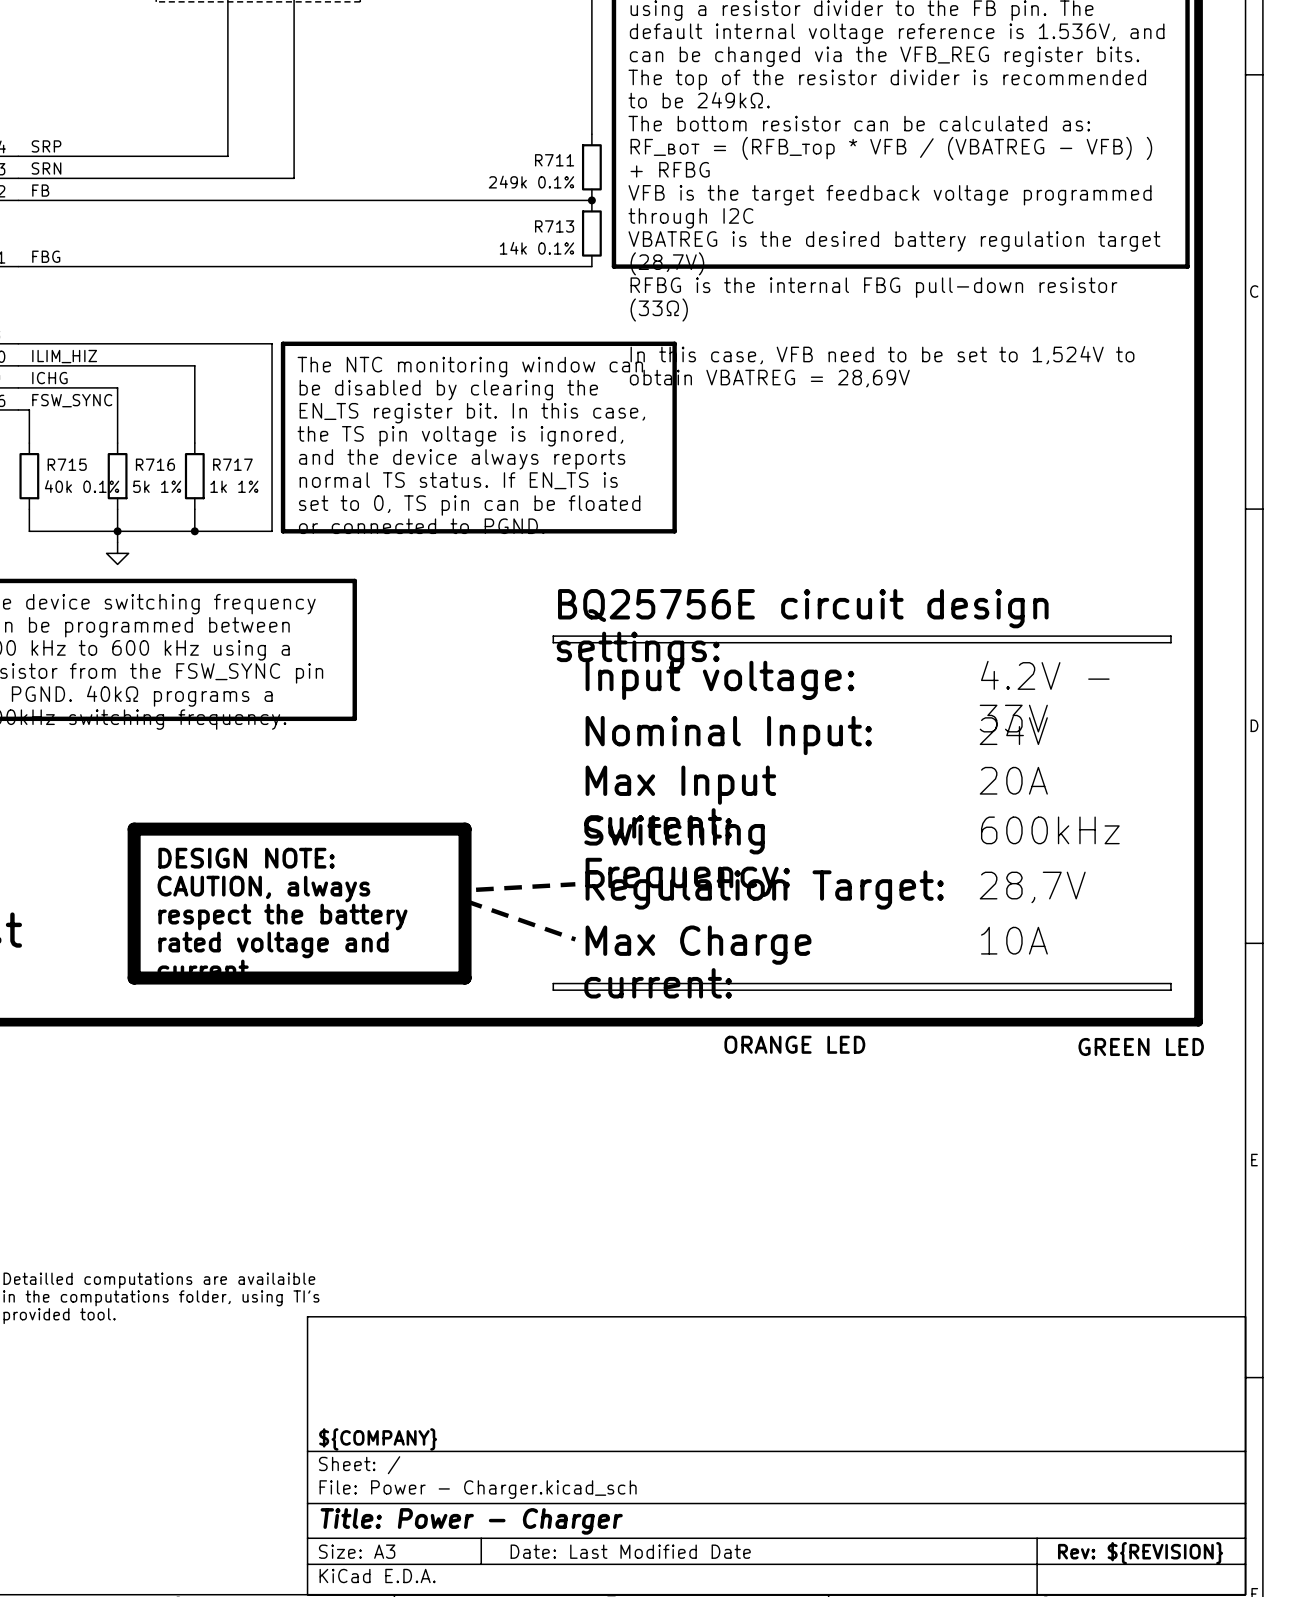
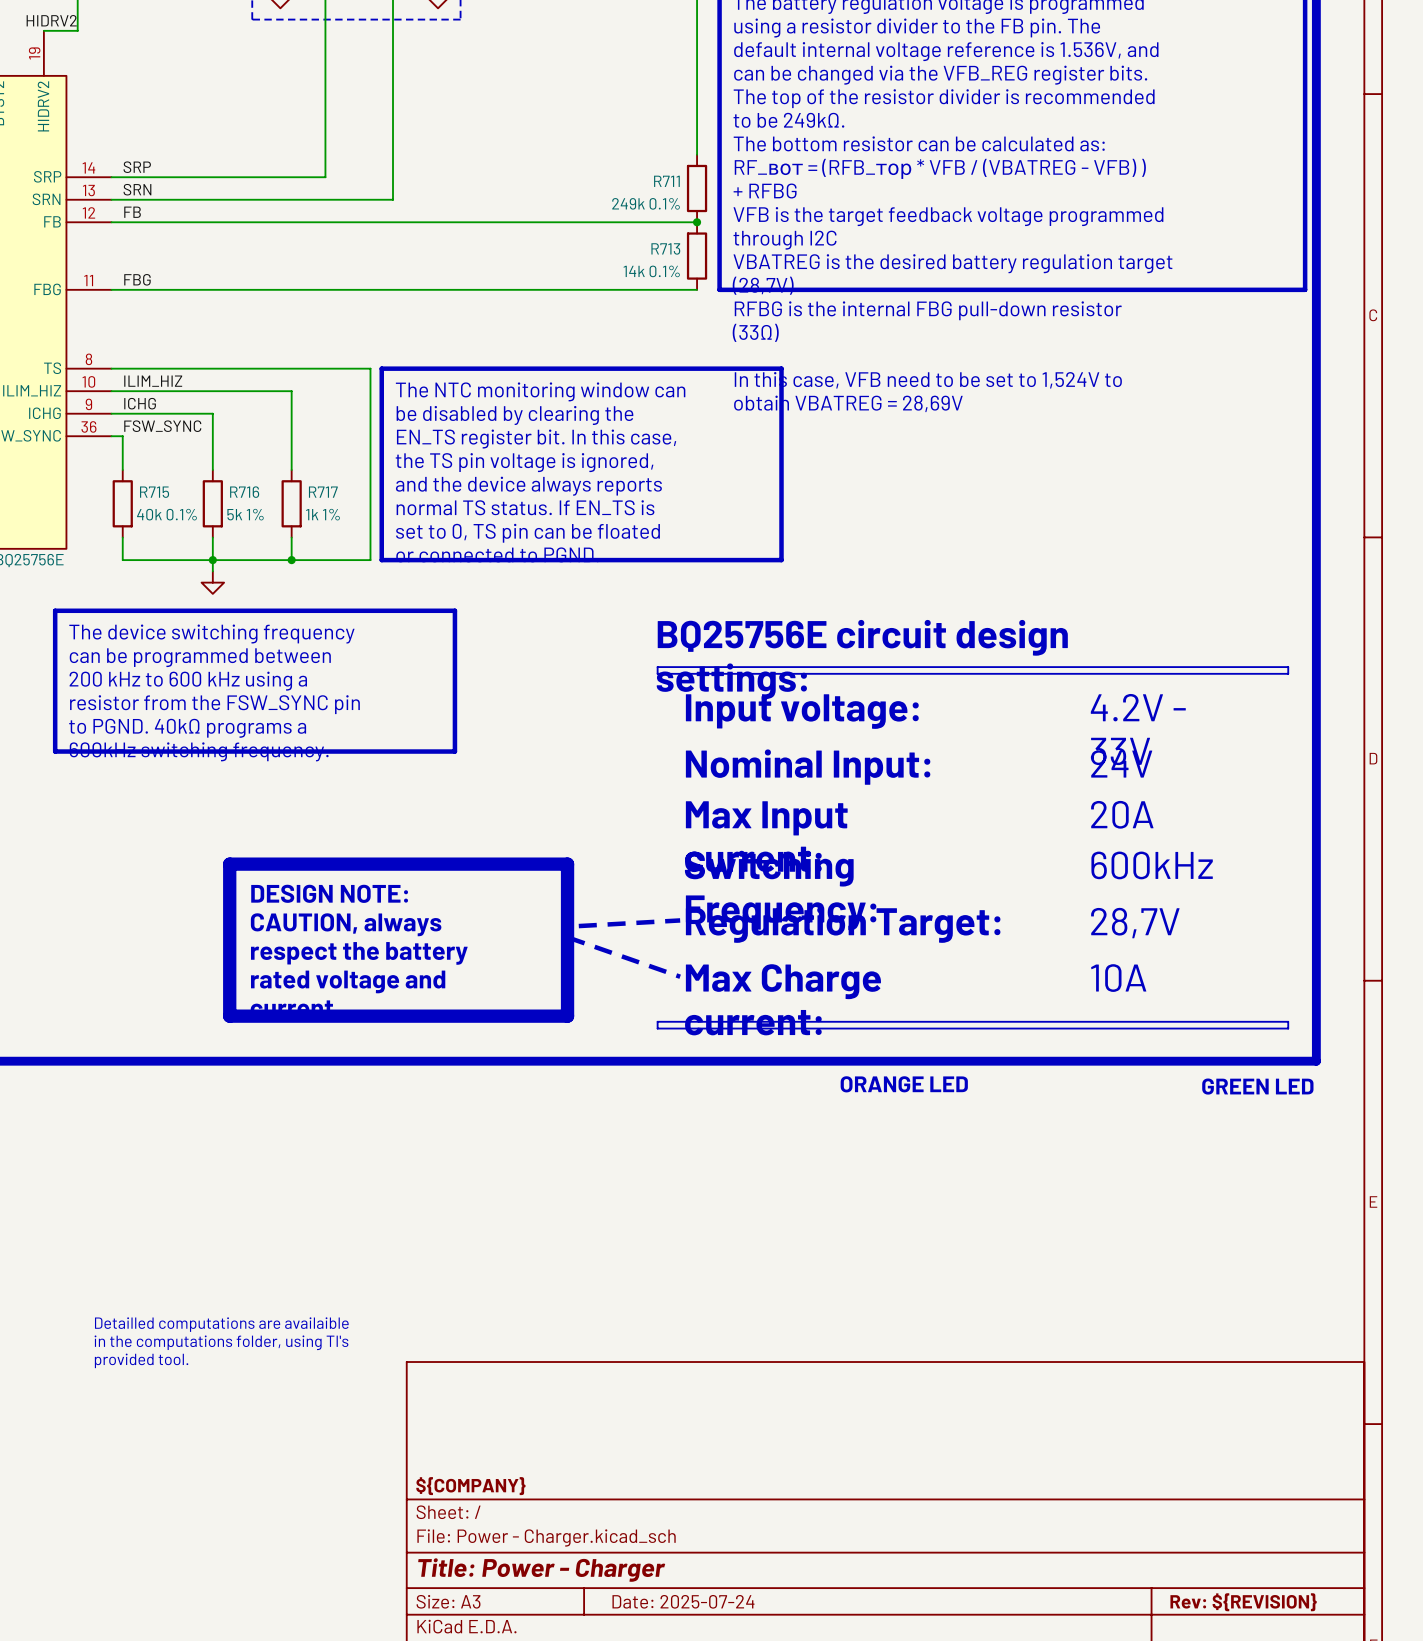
title block: Date: Last Modified Date (630, 1551) -> Date: 2025-07-24 (683, 1601)

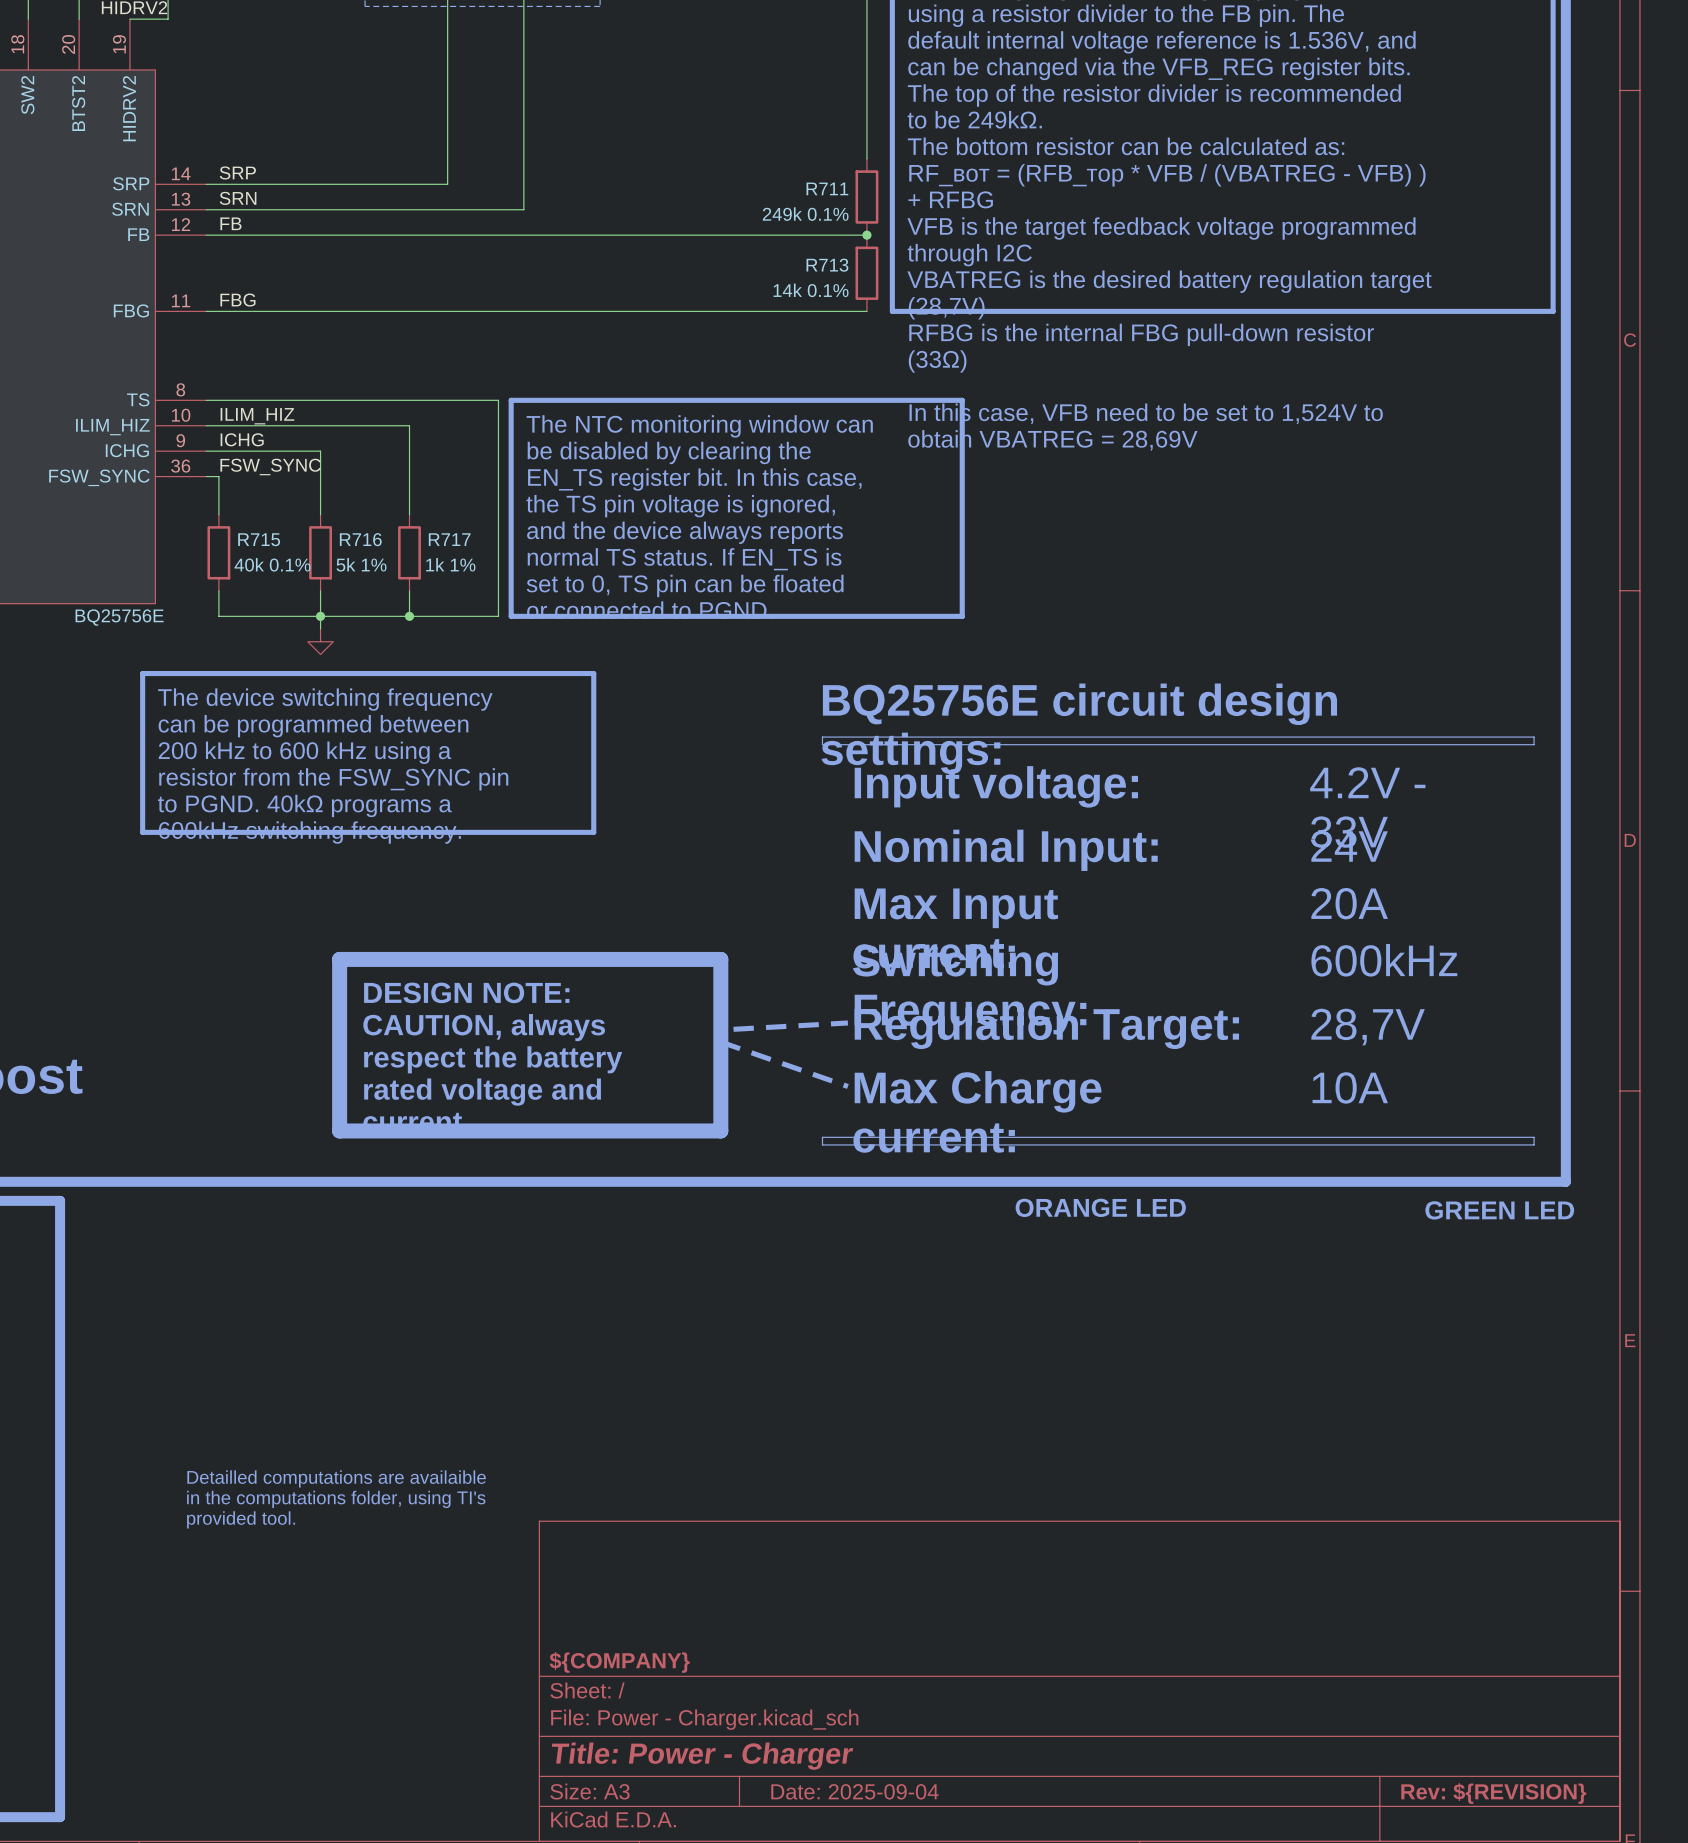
title block: Date: 2025-07-24 (683, 1601) -> Date: 2025-09-04 (854, 1791)

